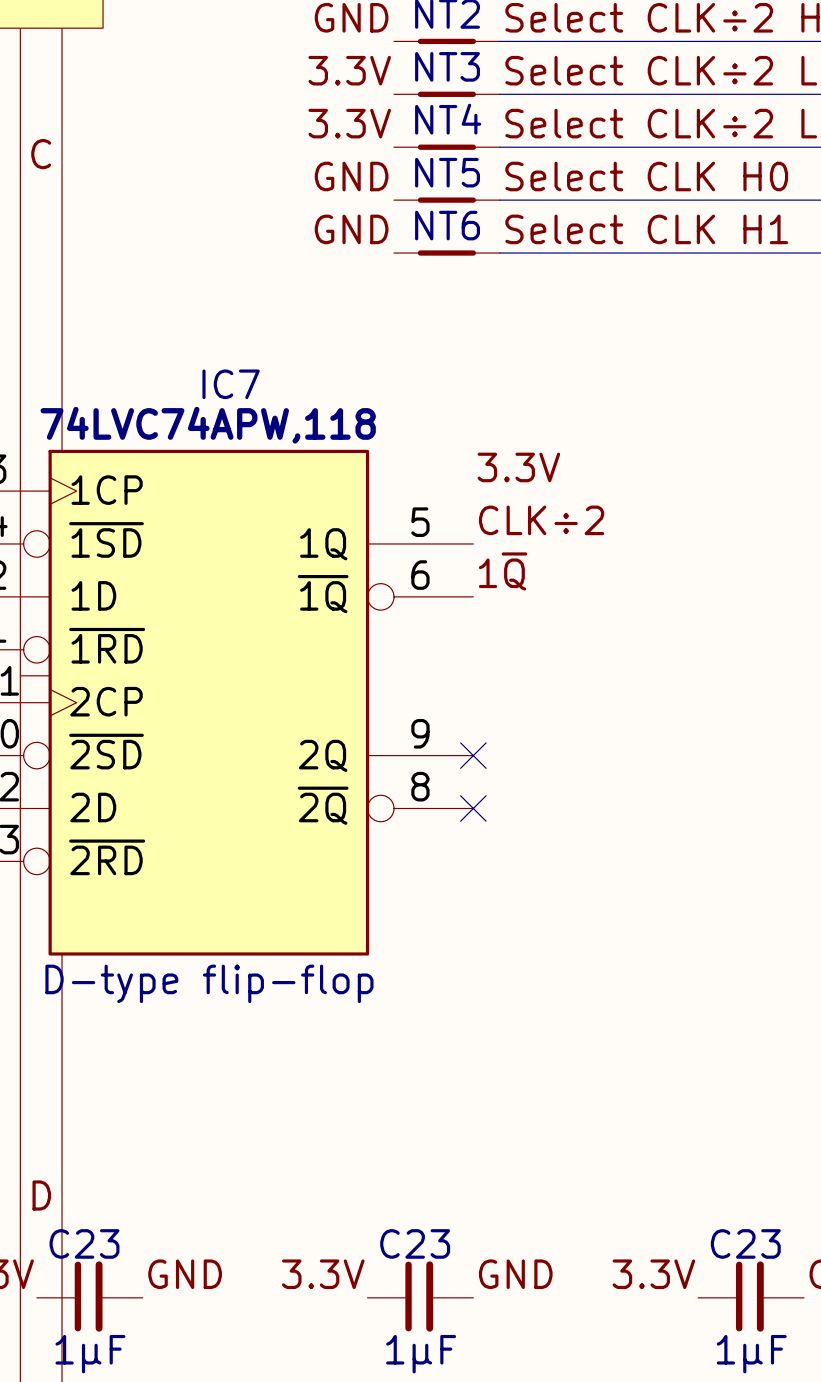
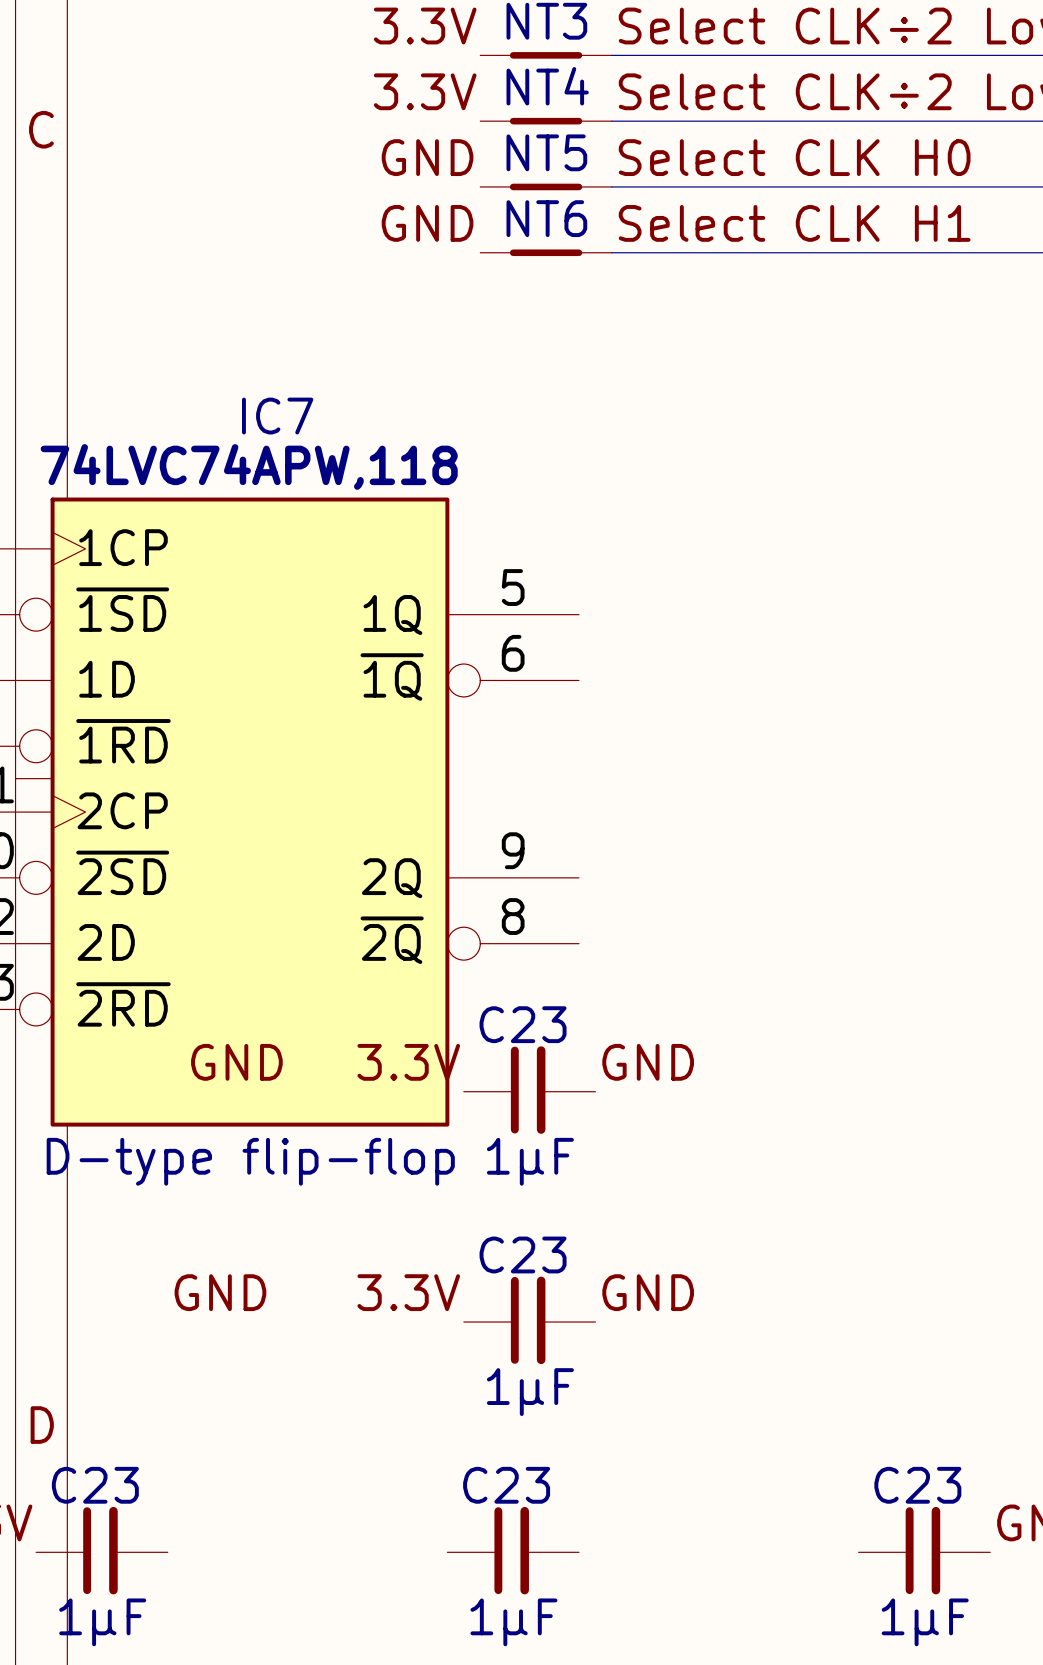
label: 3.3V (518, 467) -> none
label: CLK÷2 (541, 520) -> none
label: 1~{Q} (503, 571) -> none
no-connect mark: (473, 755) -> none
no-connect mark: (473, 808) -> none
label: none -> GND (236, 1062)
label: none -> 3.3V (408, 1062)
label: none -> GND (648, 1062)
C23: none -> 1μF (529, 1090)
label: none -> GND (220, 1292)
label: none -> 3.3V (408, 1292)
label: none -> GND (648, 1292)
C23: none -> 1μF (529, 1320)
label: GND (185, 1274) -> none
label: 3.3V (323, 1274) -> none
label: GND (515, 1274) -> none
label: 3.3V (653, 1274) -> none

